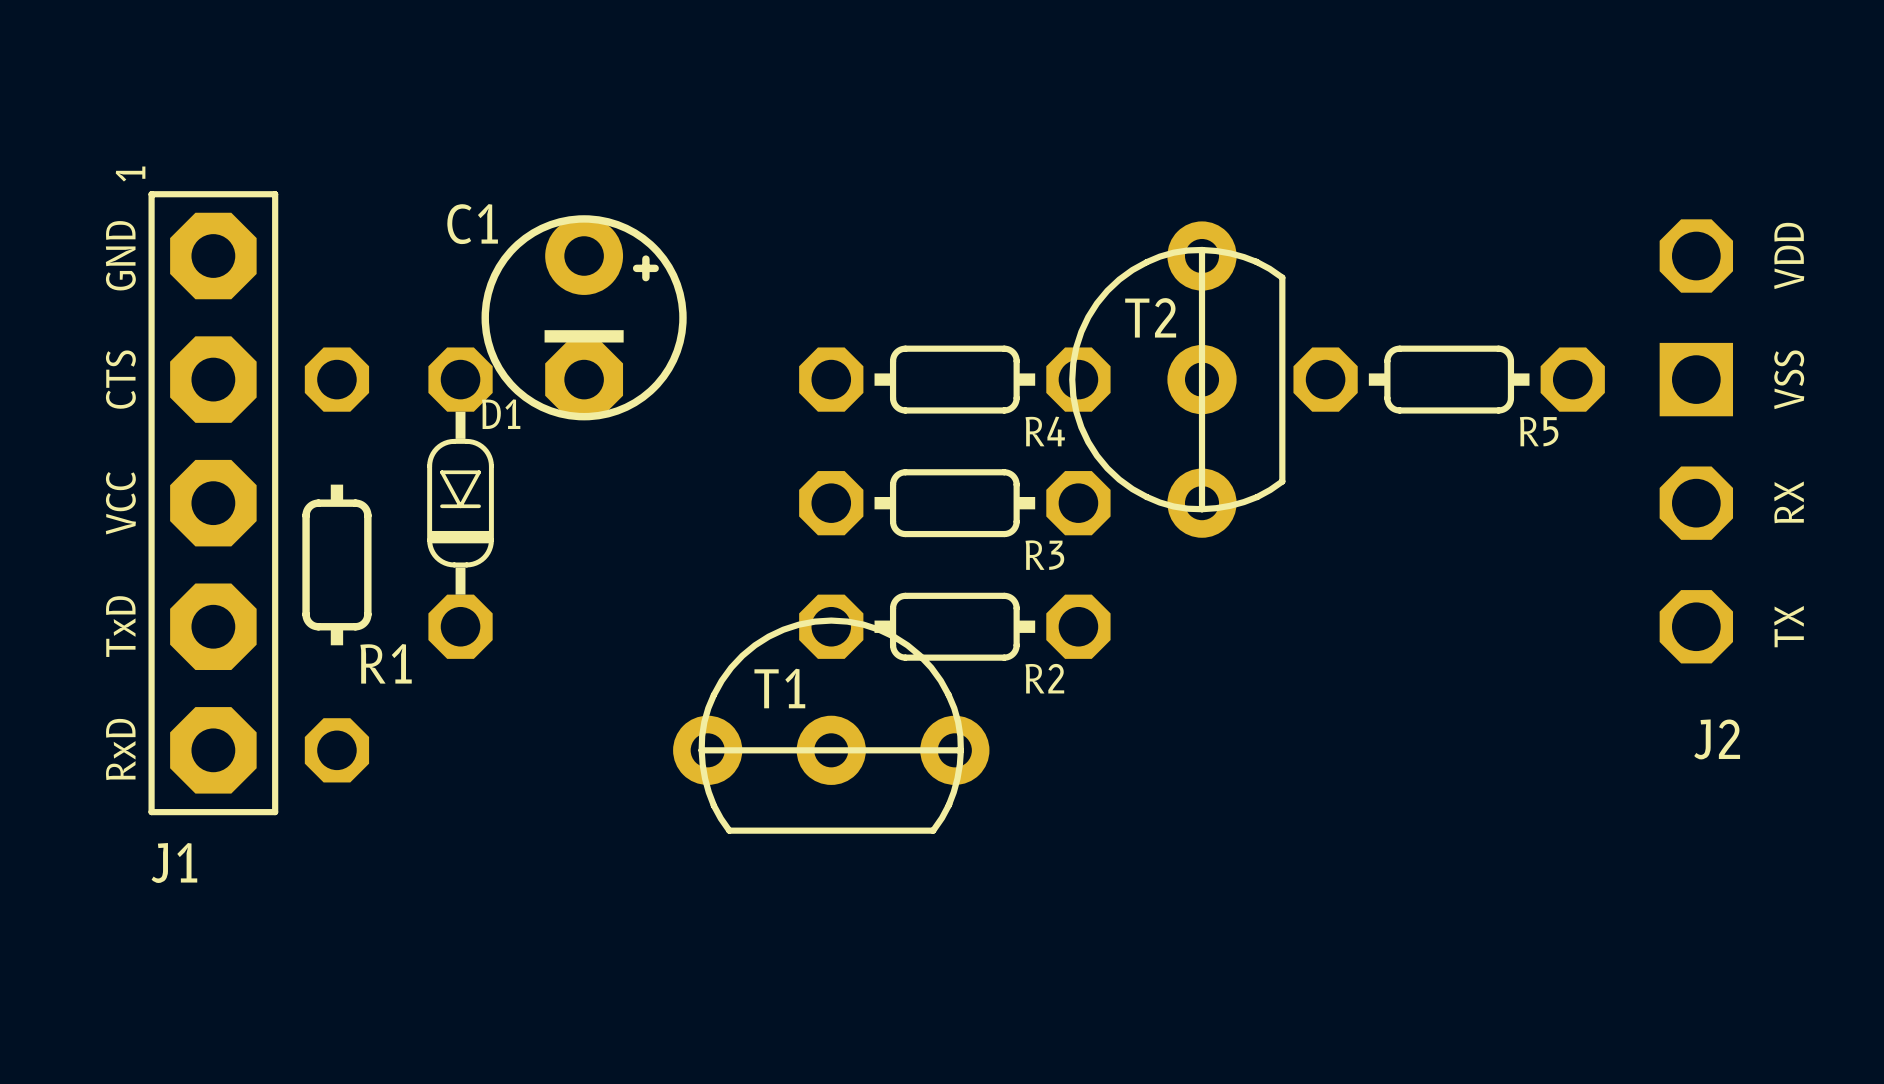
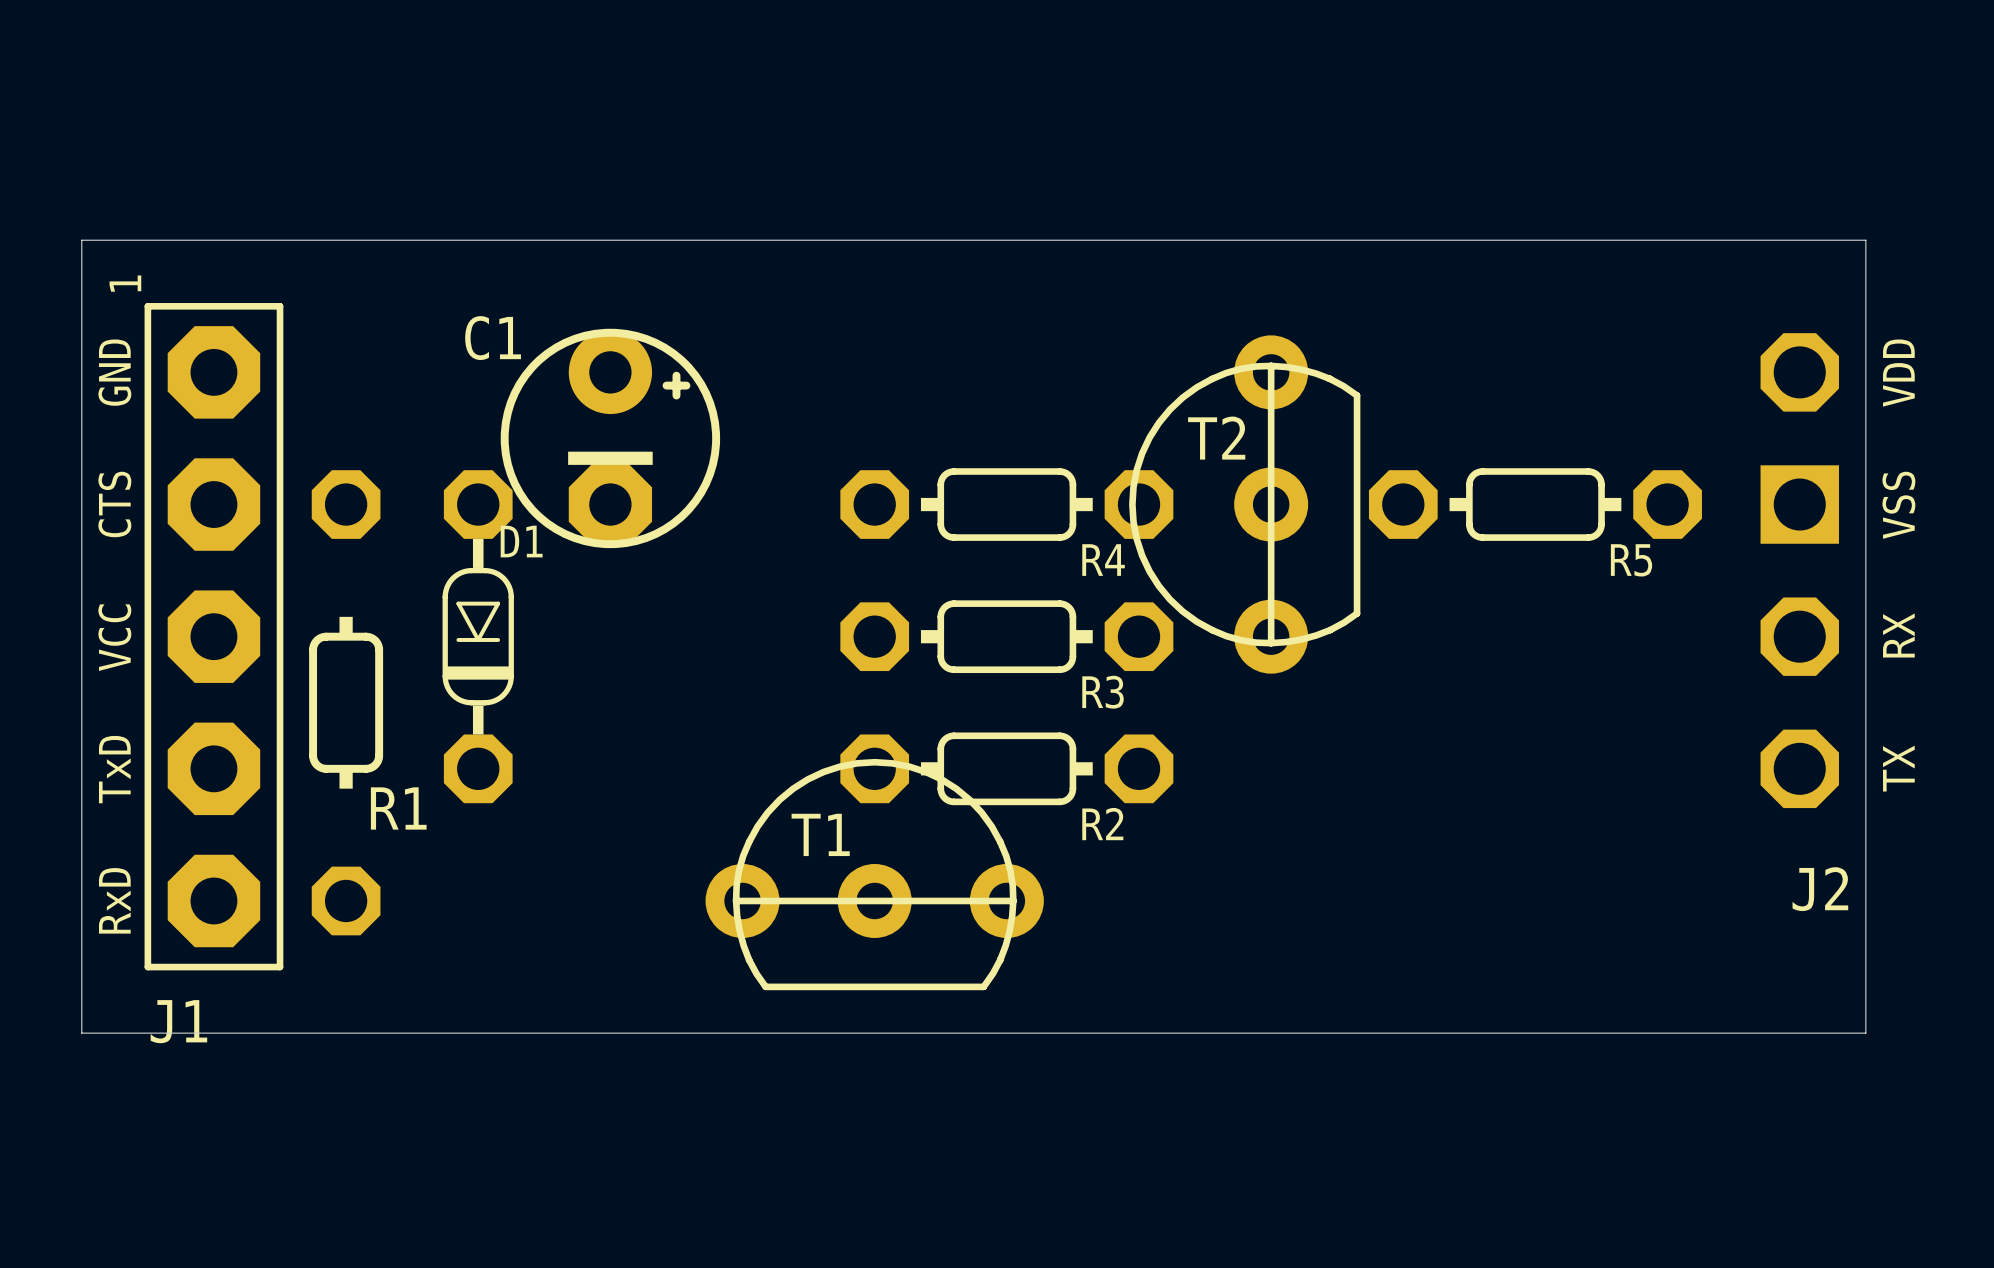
board edge: none -> (81, 240) (1865, 240) (1865, 1033) (81, 1033) (81, 240)

